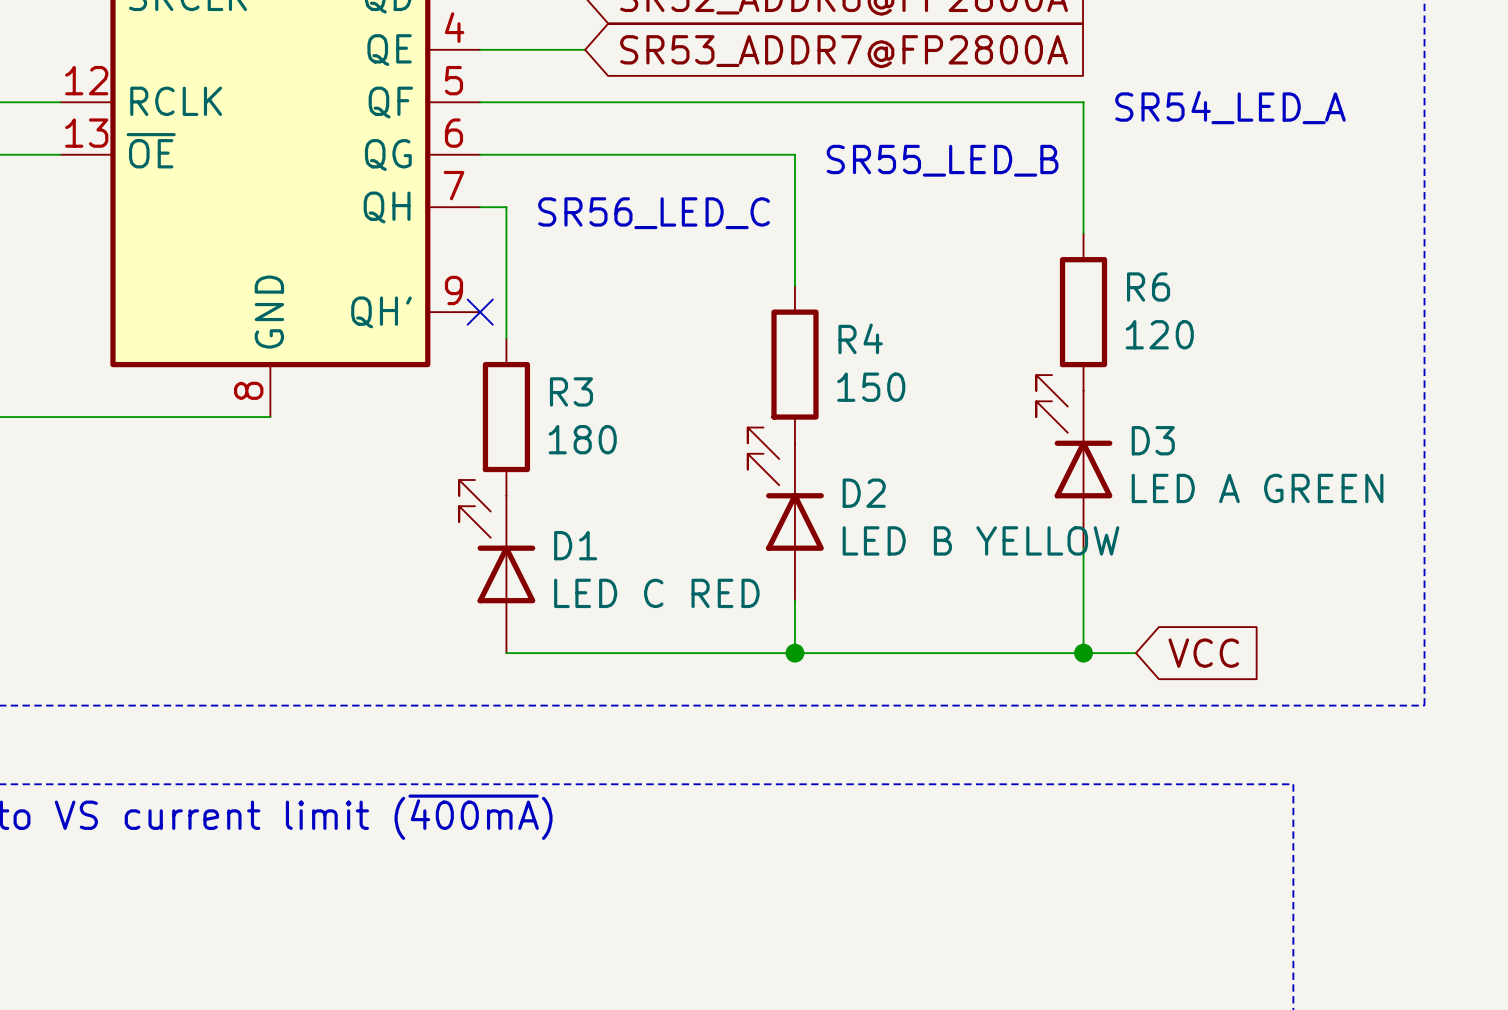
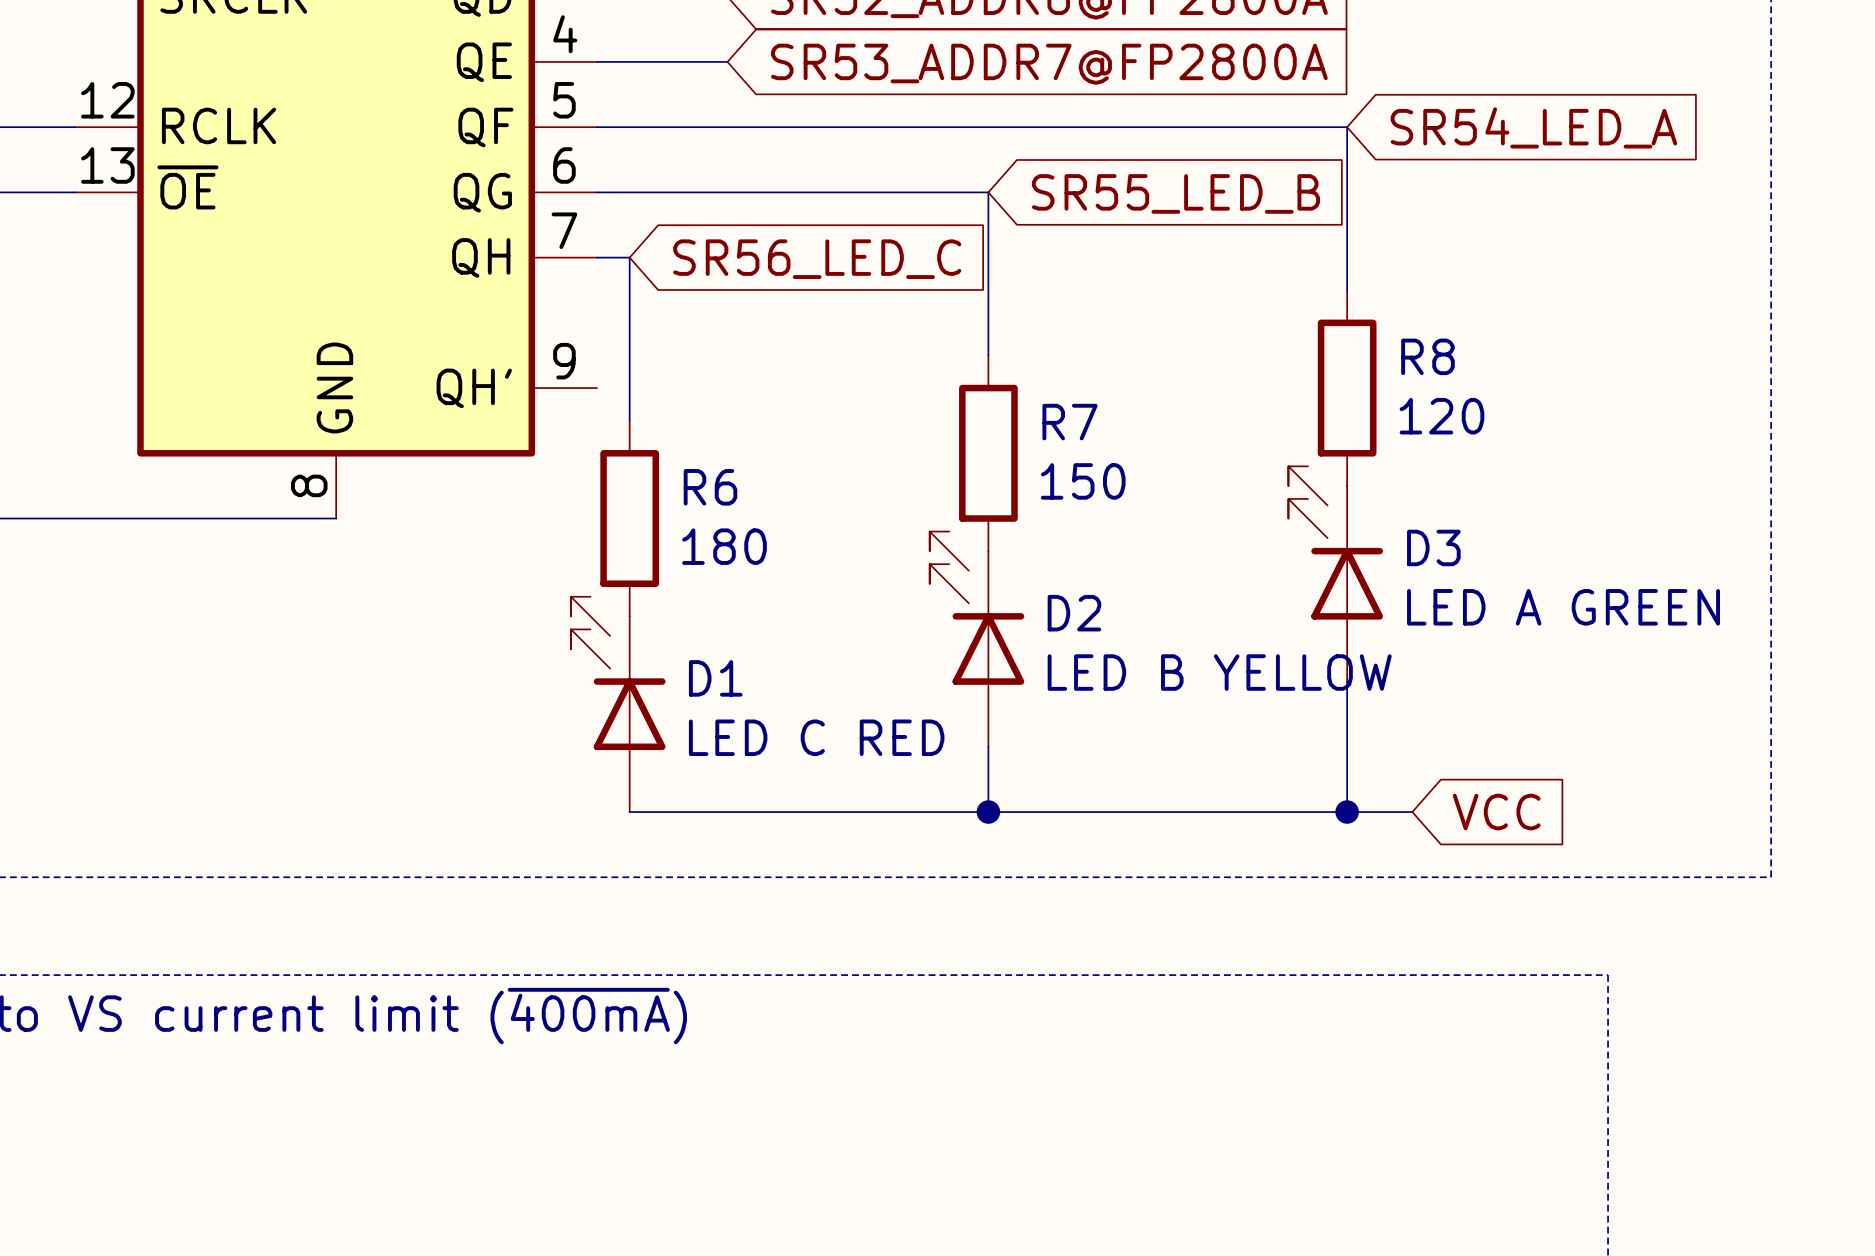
global label: none -> SR54_LED_A (1533, 127)
text: SR54_LED_A (1230, 107) -> none
global label: none -> SR55_LED_B (1175, 193)
text: SR55_LED_B (942, 160) -> none
global label: none -> SR56_LED_C (817, 259)
text: SR56_LED_C (654, 213) -> none
R6 name: R6 (1148, 287) -> R8 (1427, 356)
no-connect mark: (480, 312) -> none
R4 name: R4 (860, 338) -> R7 (1070, 422)
R3 name: R3 (571, 391) -> R6 (710, 487)

